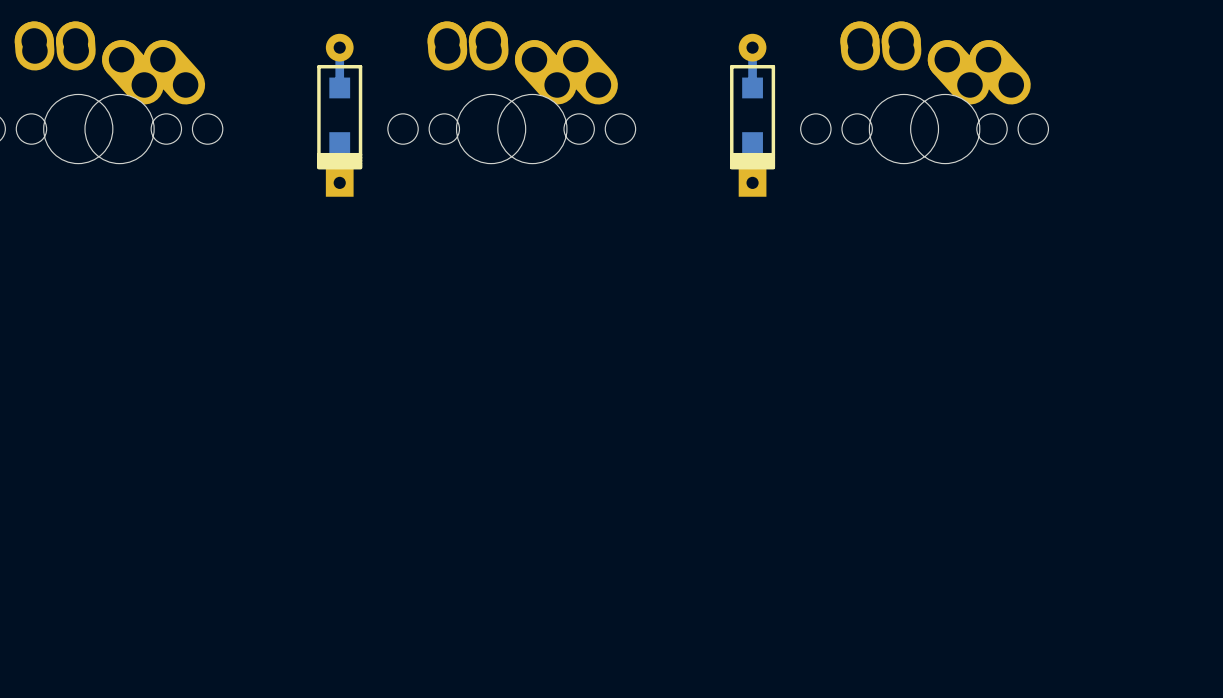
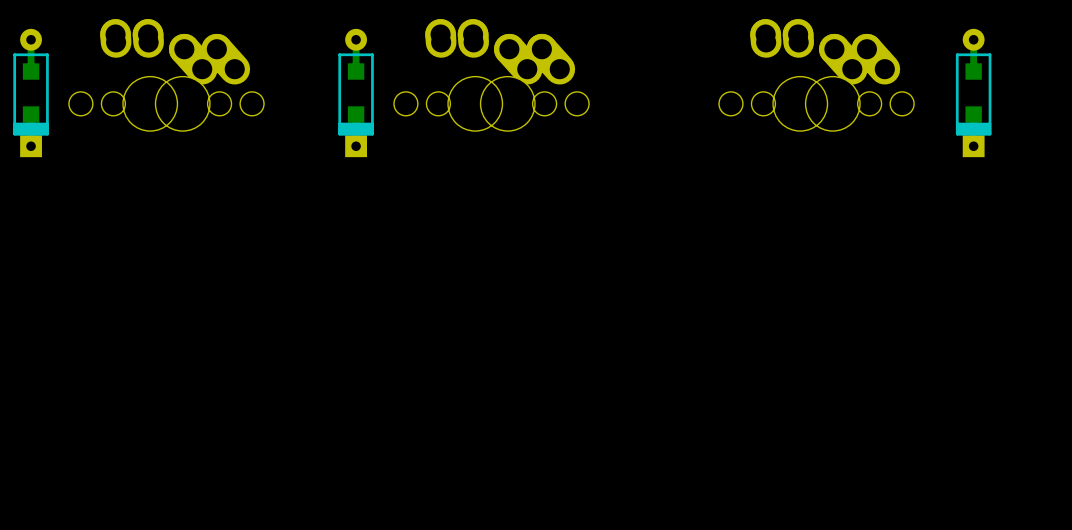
part position: (752, 115) -> (973, 93)

